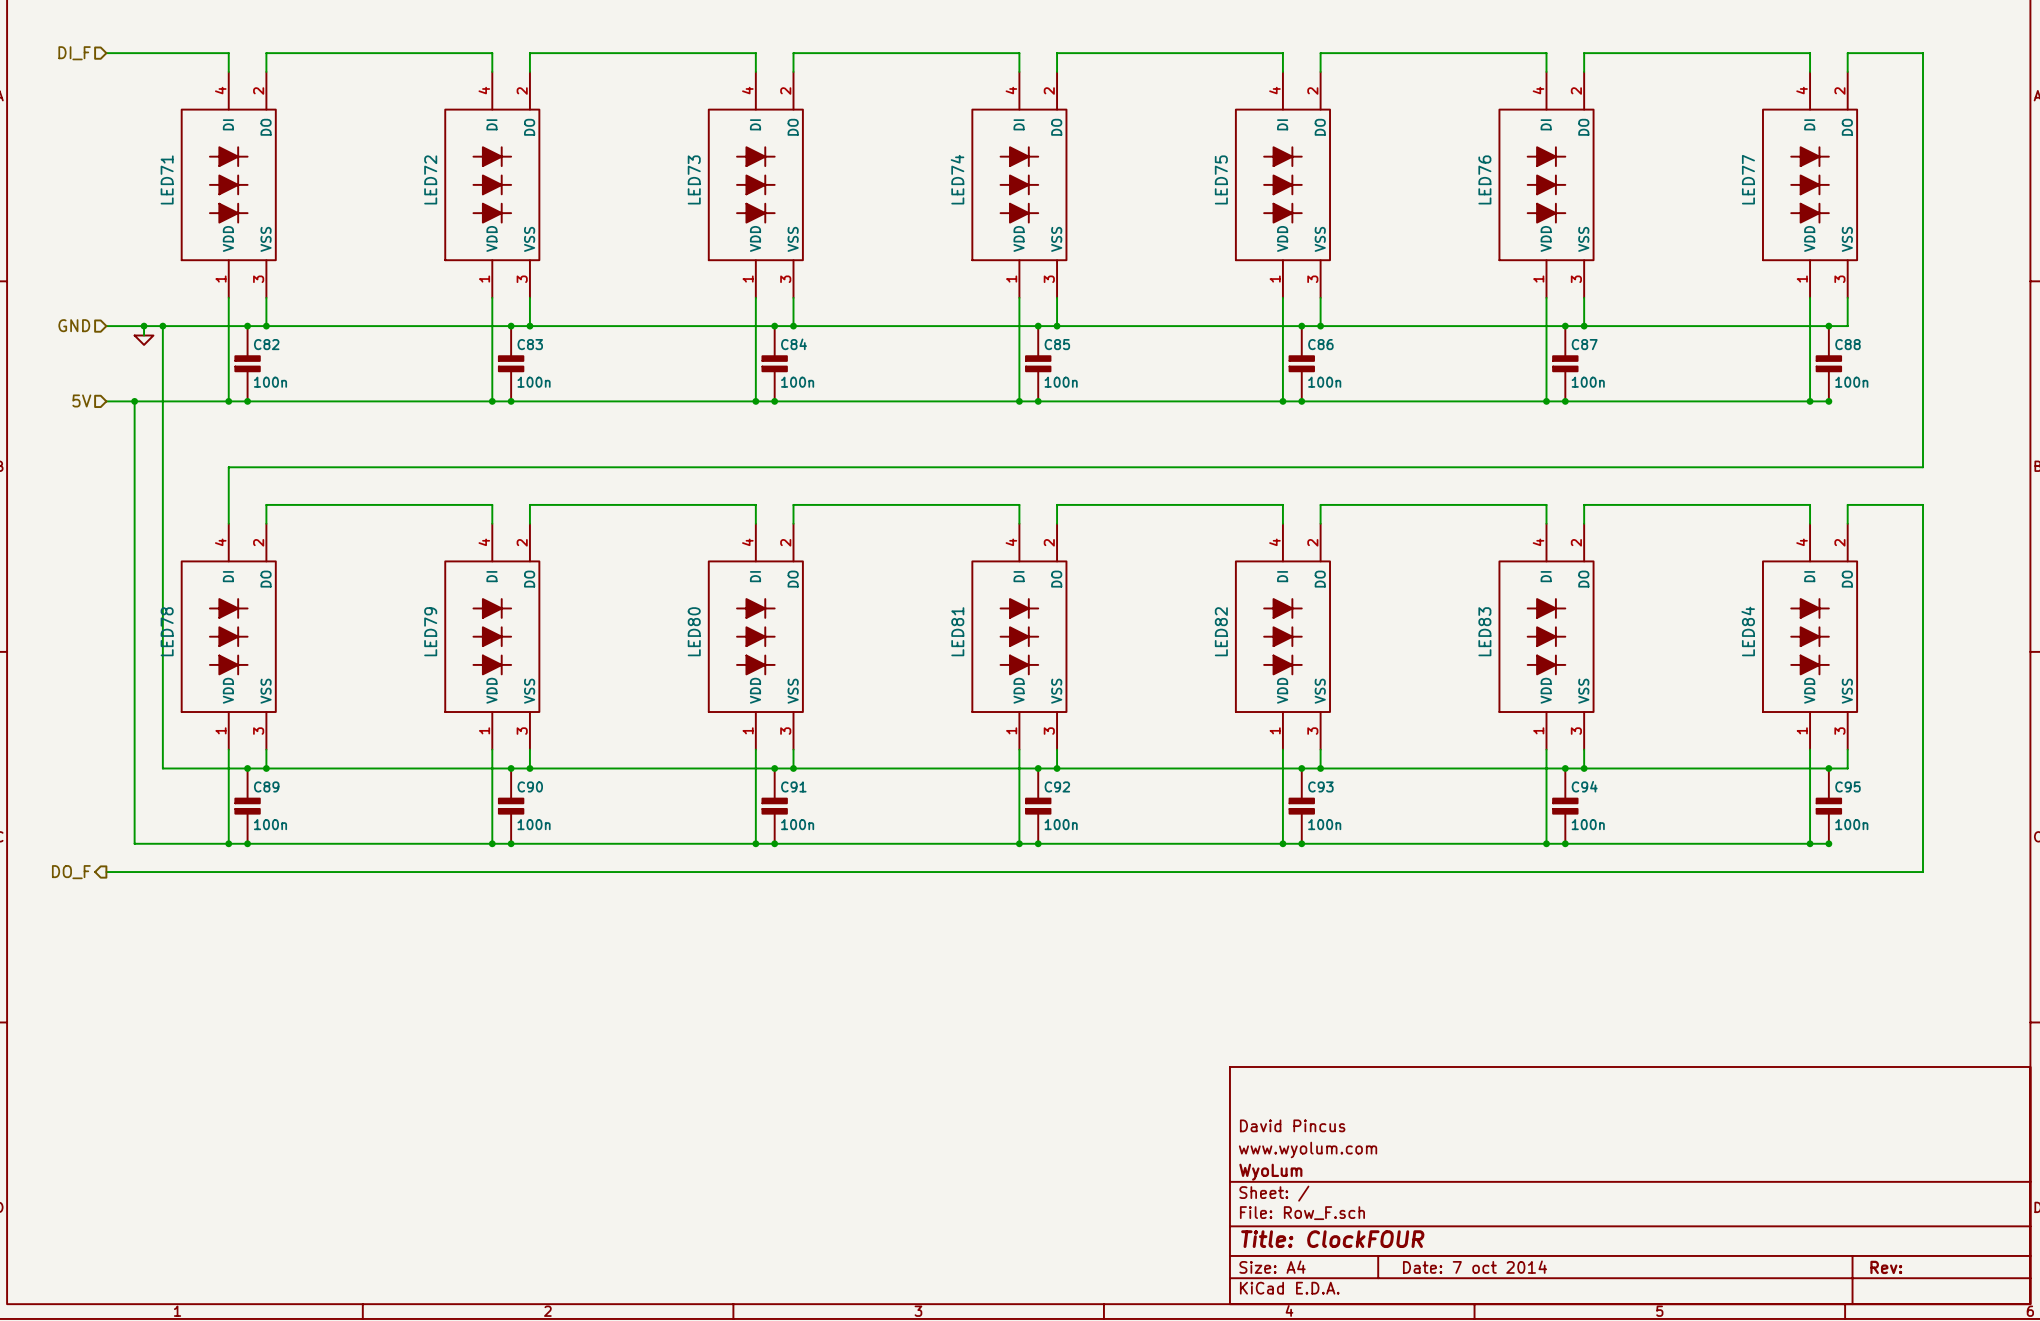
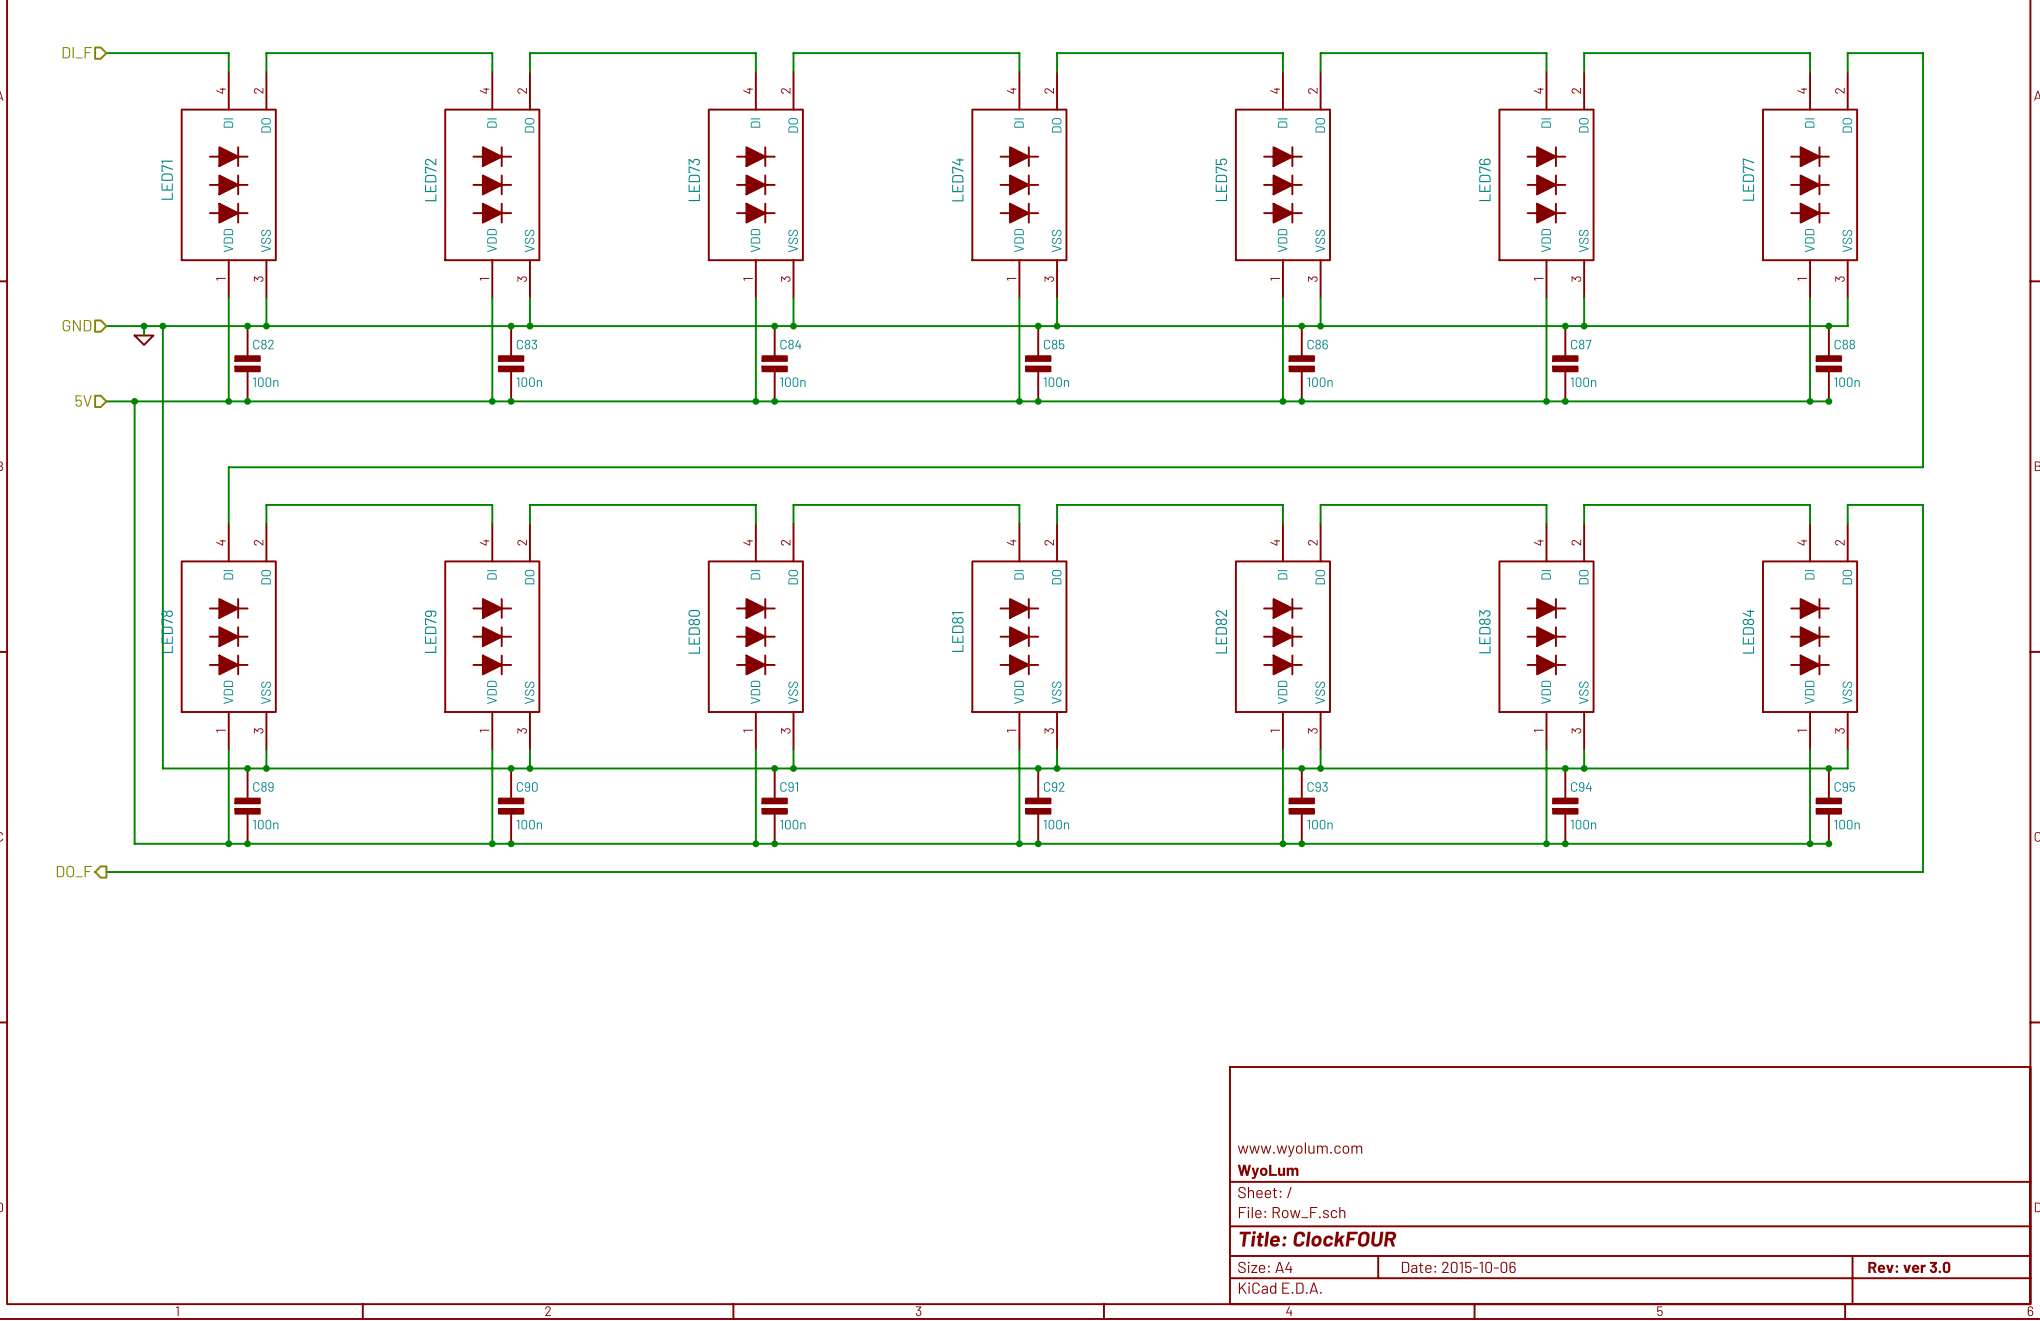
title block: David Pincus (1292, 1125) -> none
title block: Date: 7 oct 2014 (1475, 1267) -> Date: 2015-10-06 (1458, 1267)
title block: Rev: (1886, 1267) -> Rev: ver 3.0 (1909, 1267)

